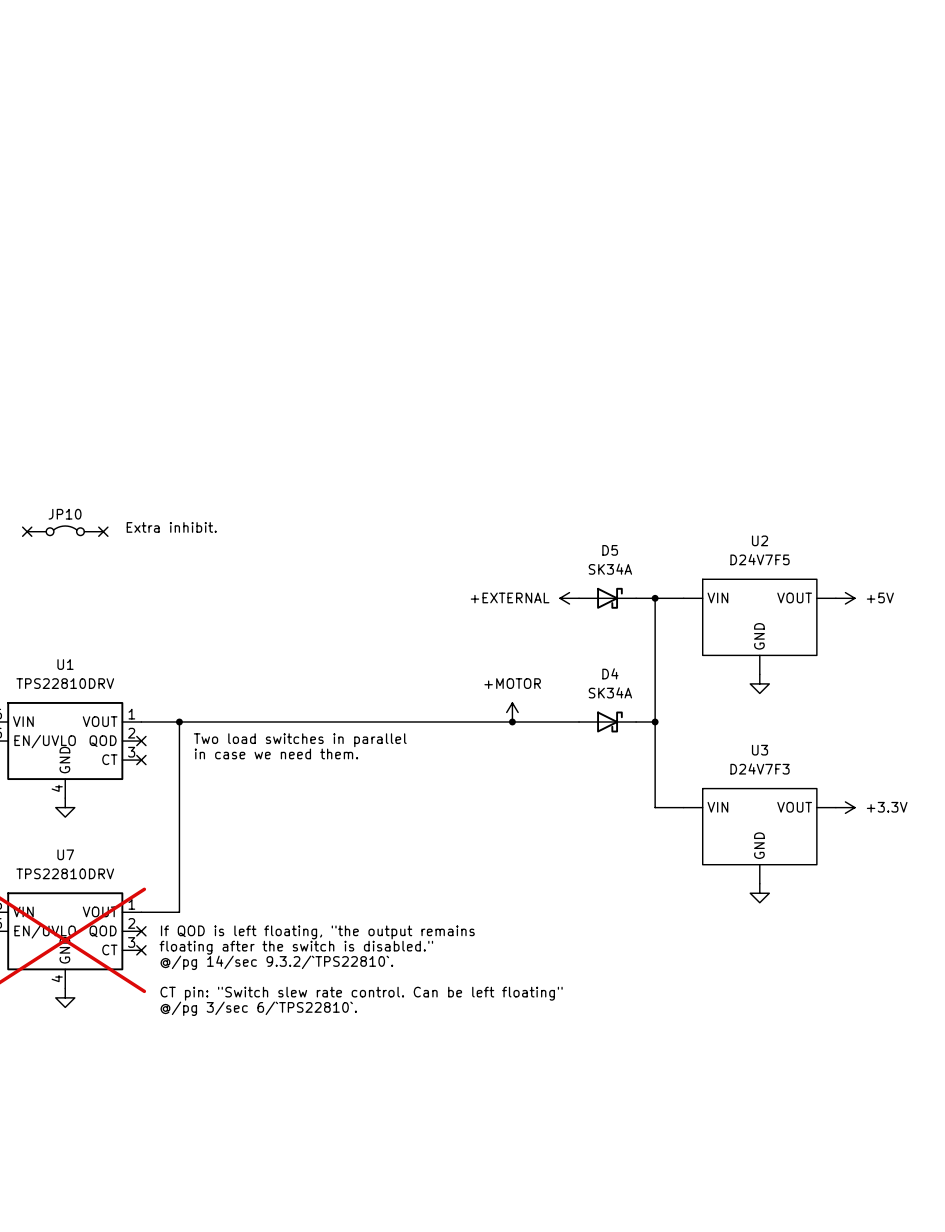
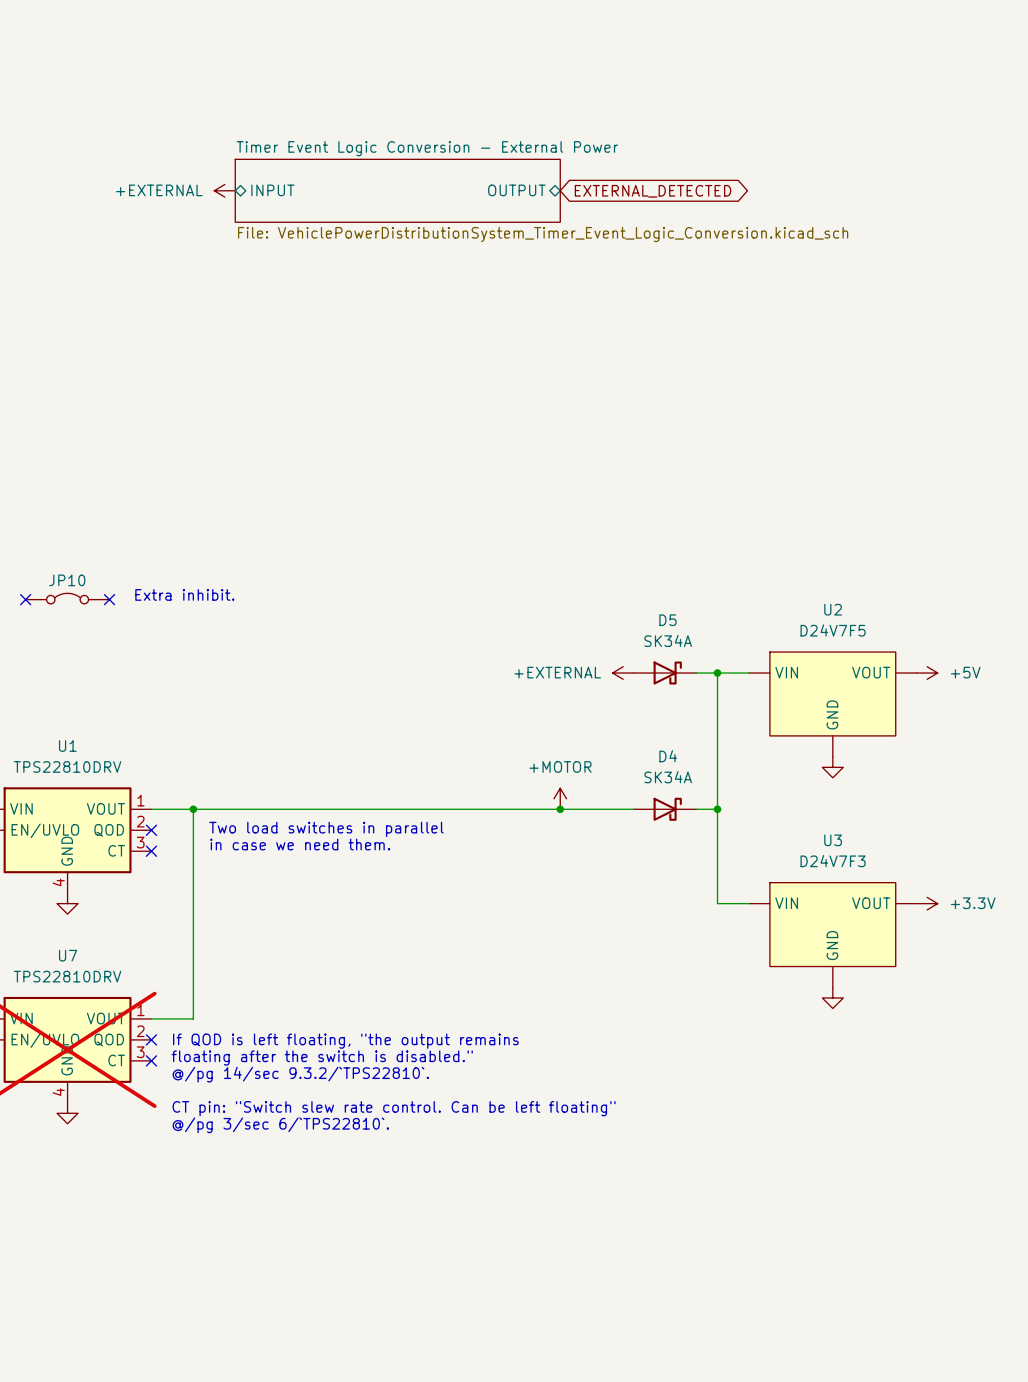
power symbol: none -> +EXTERNAL (224, 190)
sheet pin: none -> INPUT (272, 190)
sheet Timer Event Logic Conversion - External Power: none -> File: VehiclePowerDistributionSystem_Timer_Event_Logic_Conversion.kicad_sch (397, 190)
sheet pin: none -> OUTPUT (516, 190)
global label: none -> EXTERNAL_DETECTED (653, 191)

